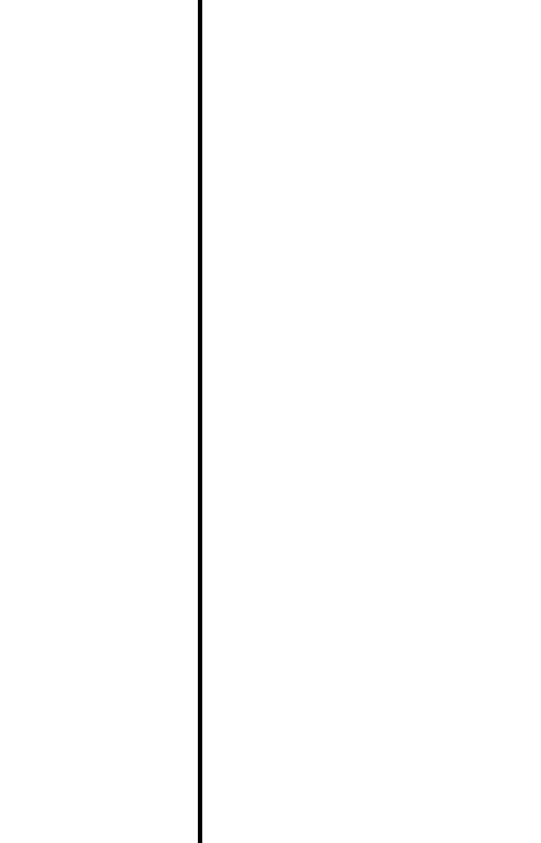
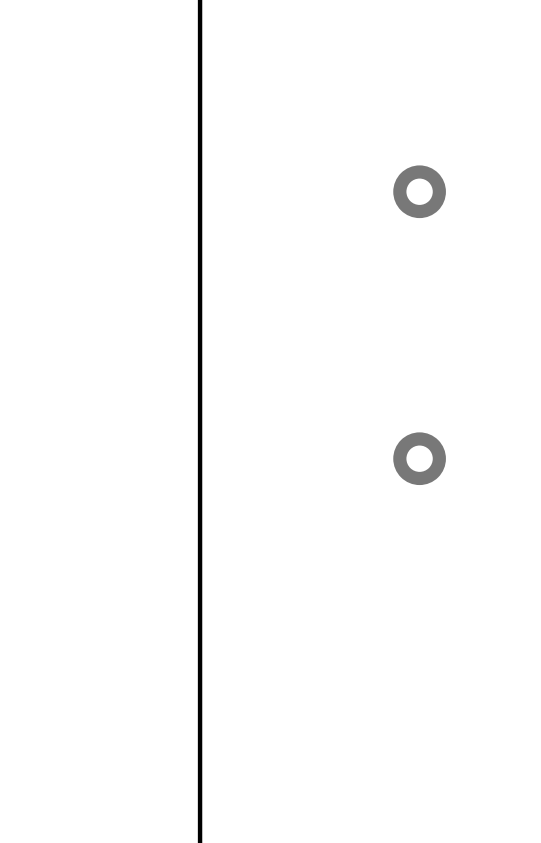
via: none -> (419, 191)
via: none -> (419, 458)

